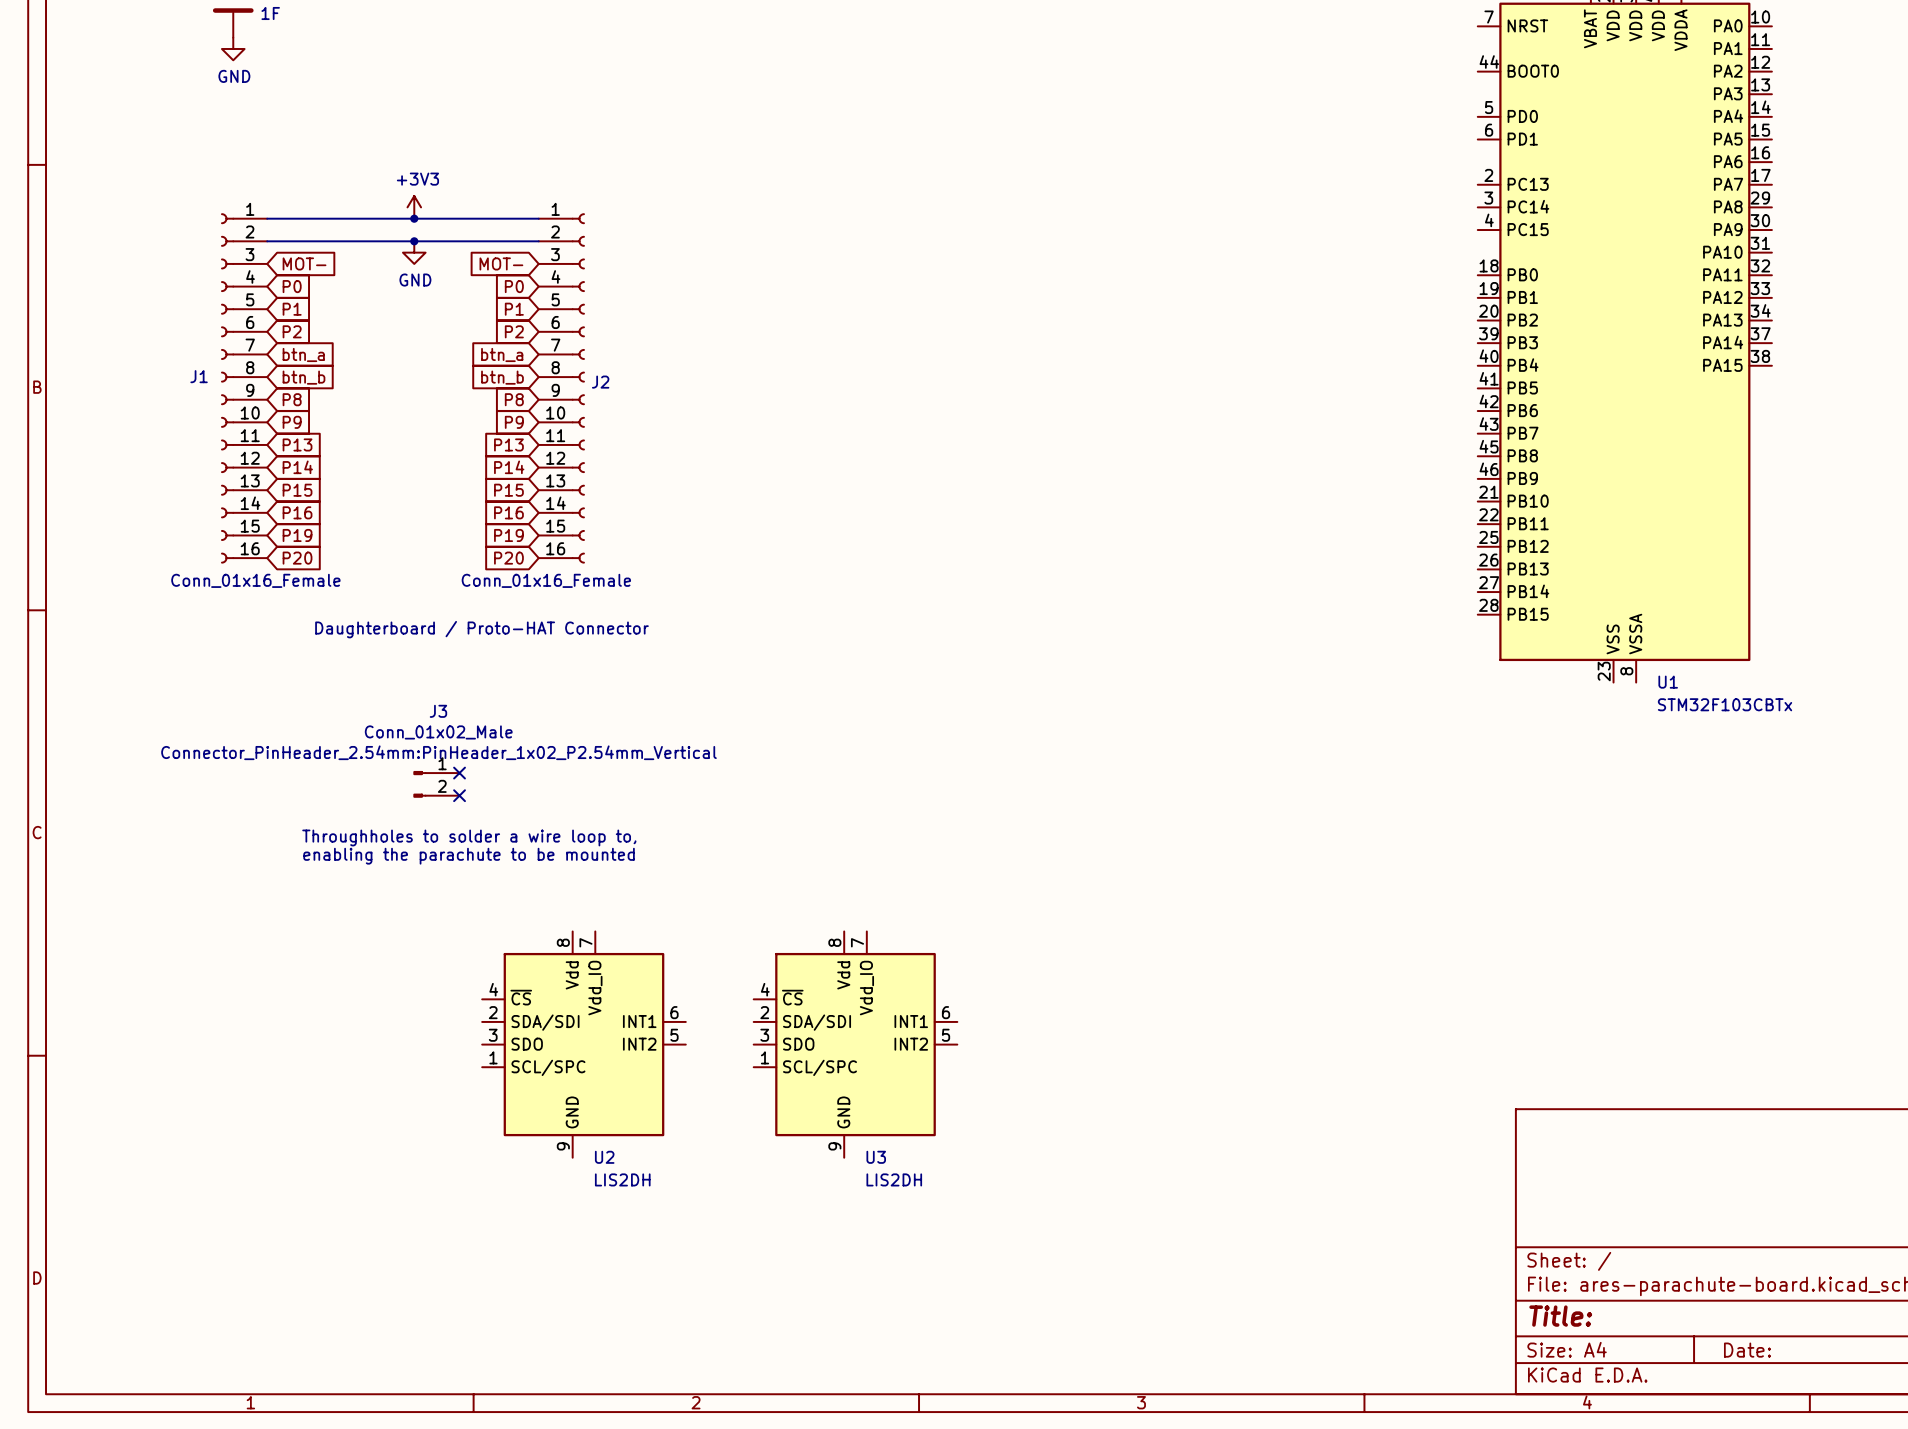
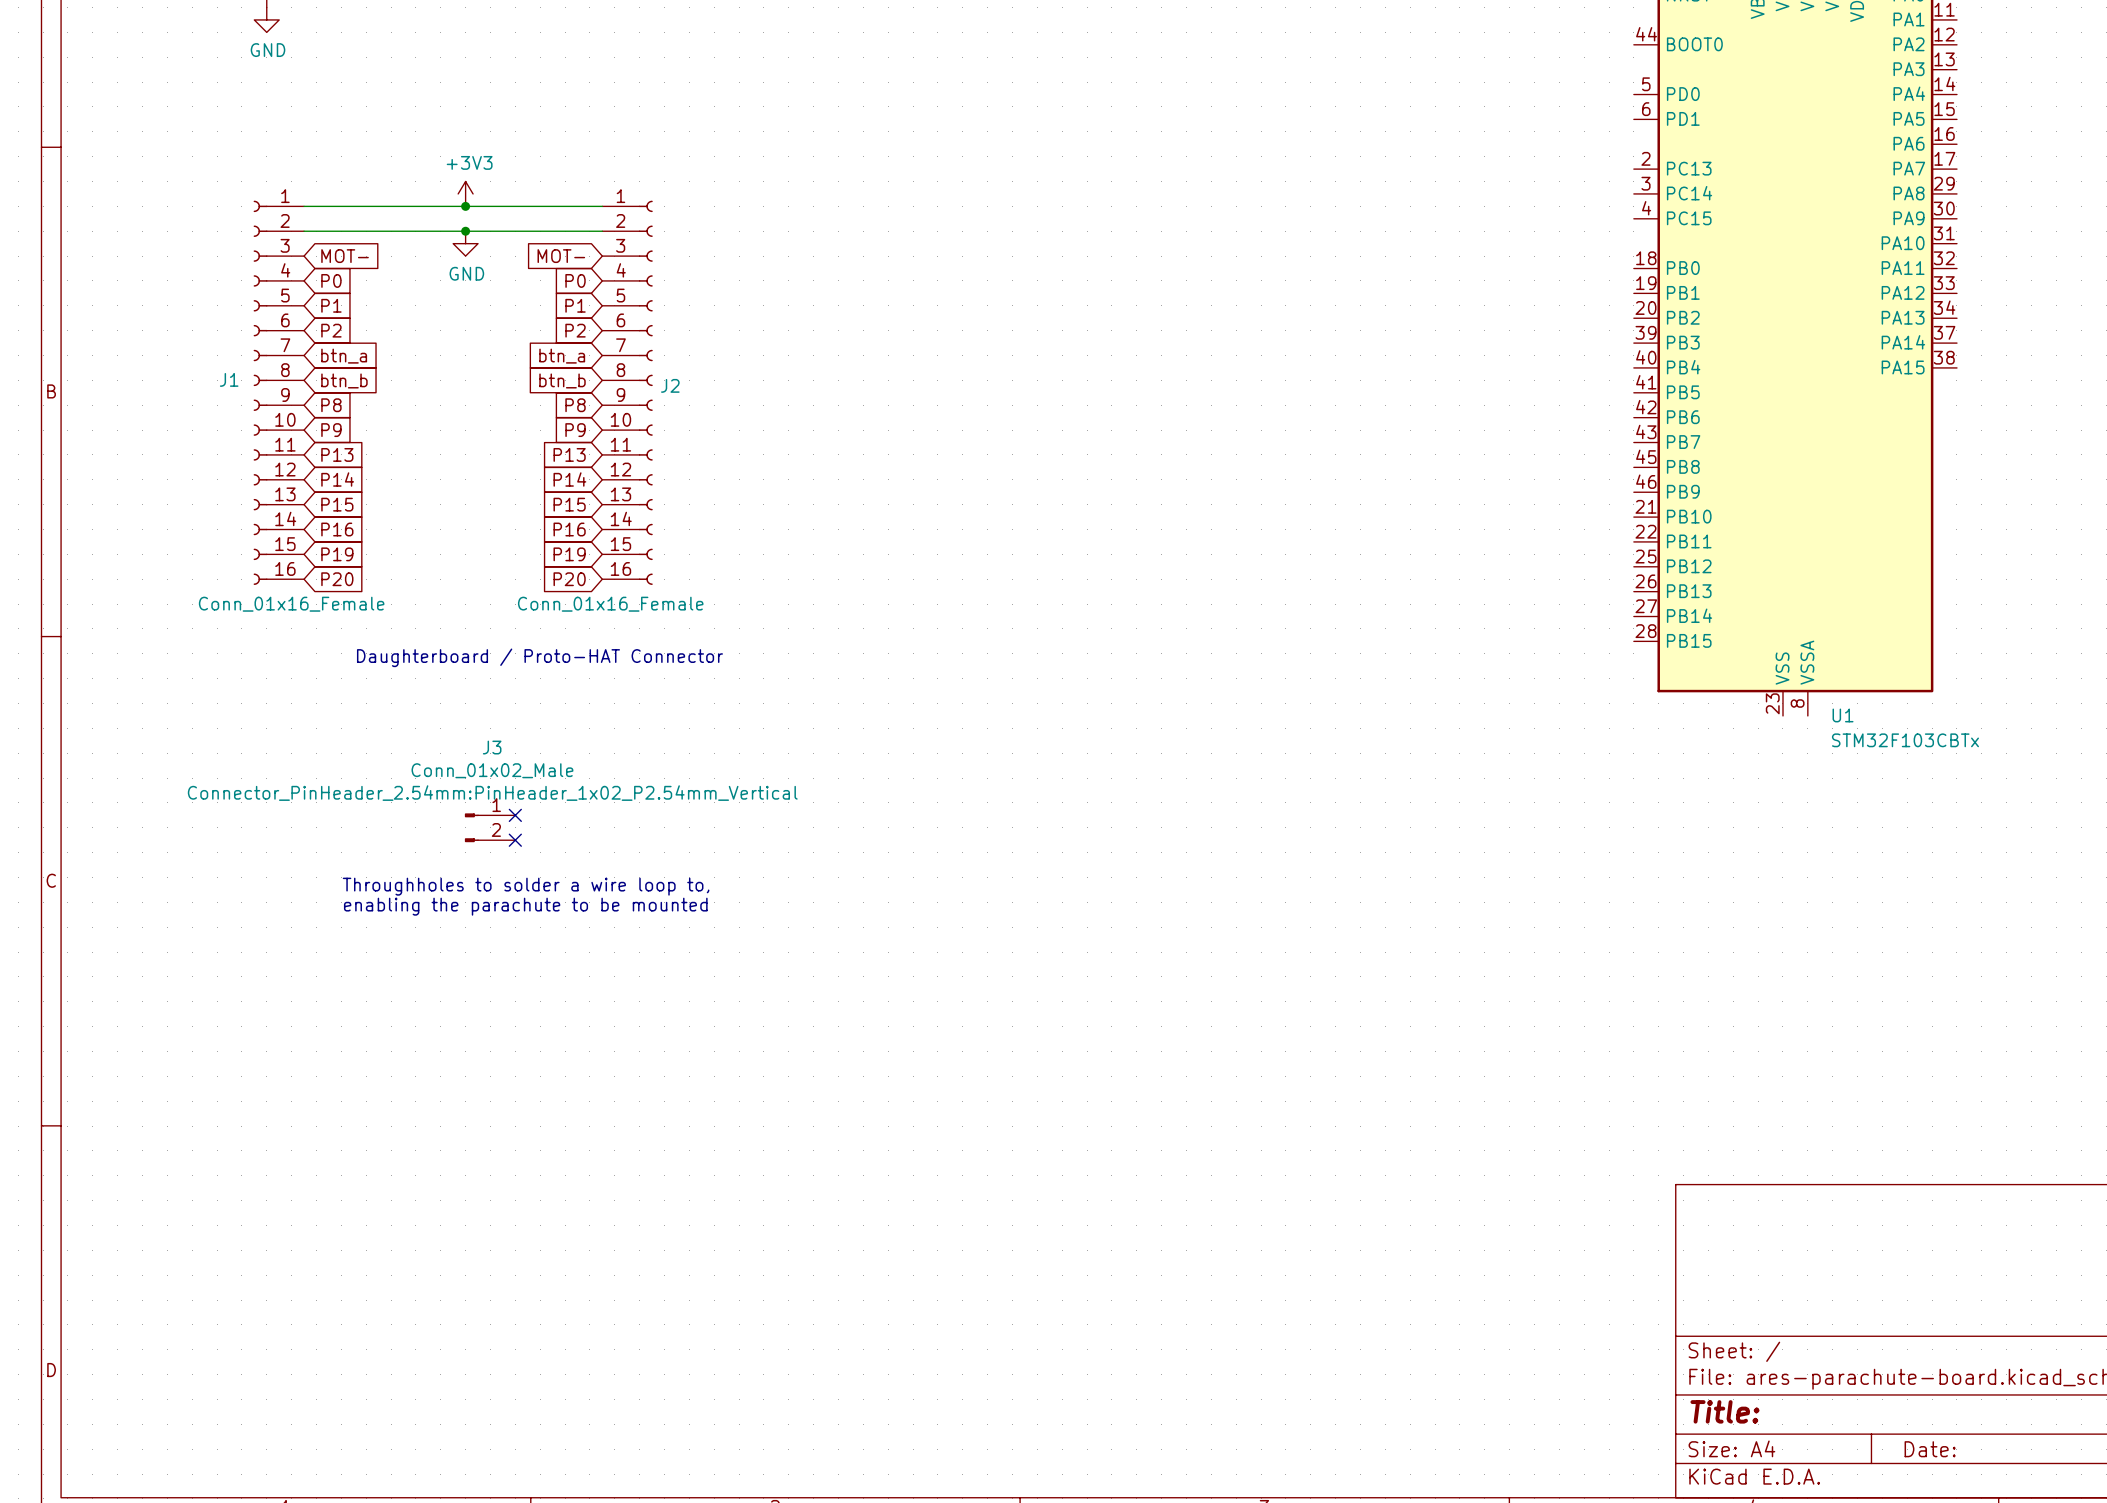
U2: LIS2DH (583, 1044) -> none
U3: LIS2DH (855, 1044) -> none

